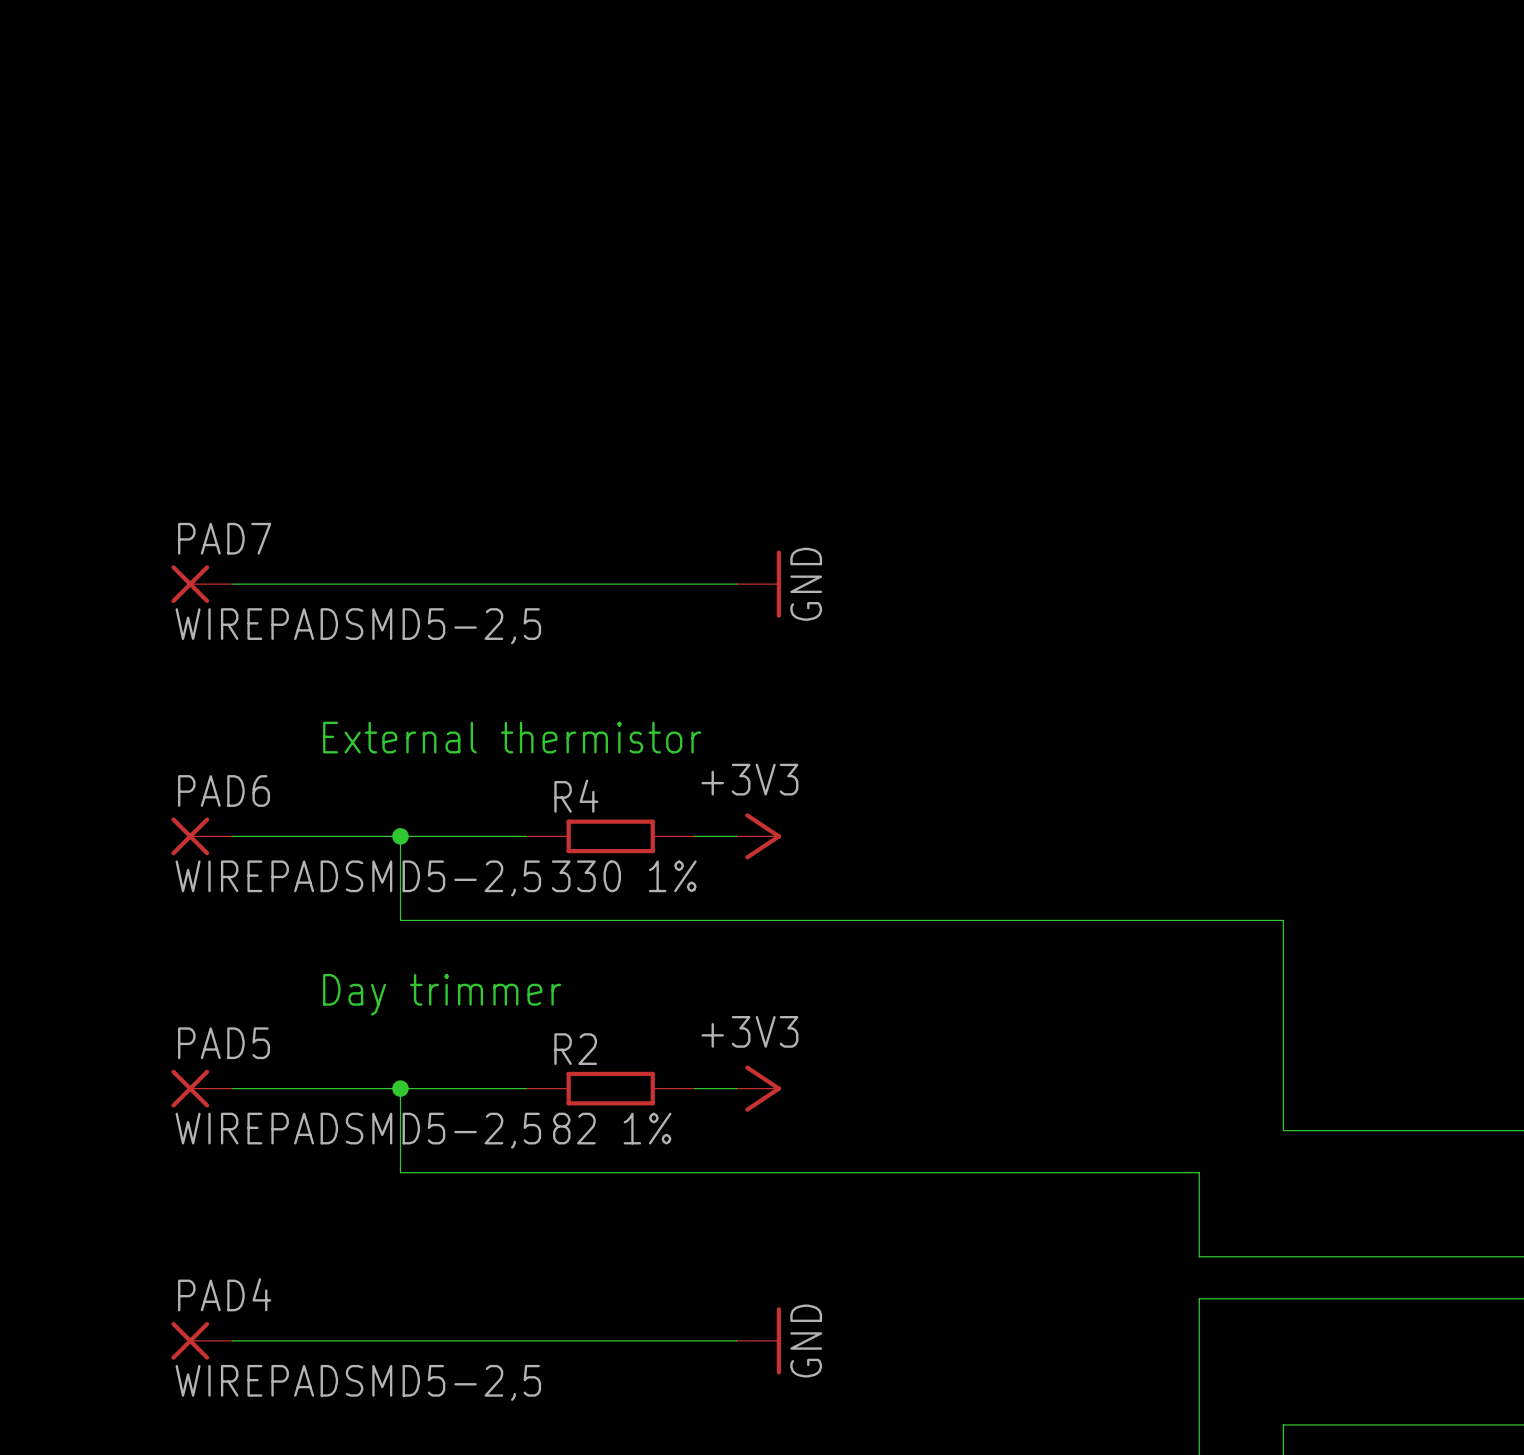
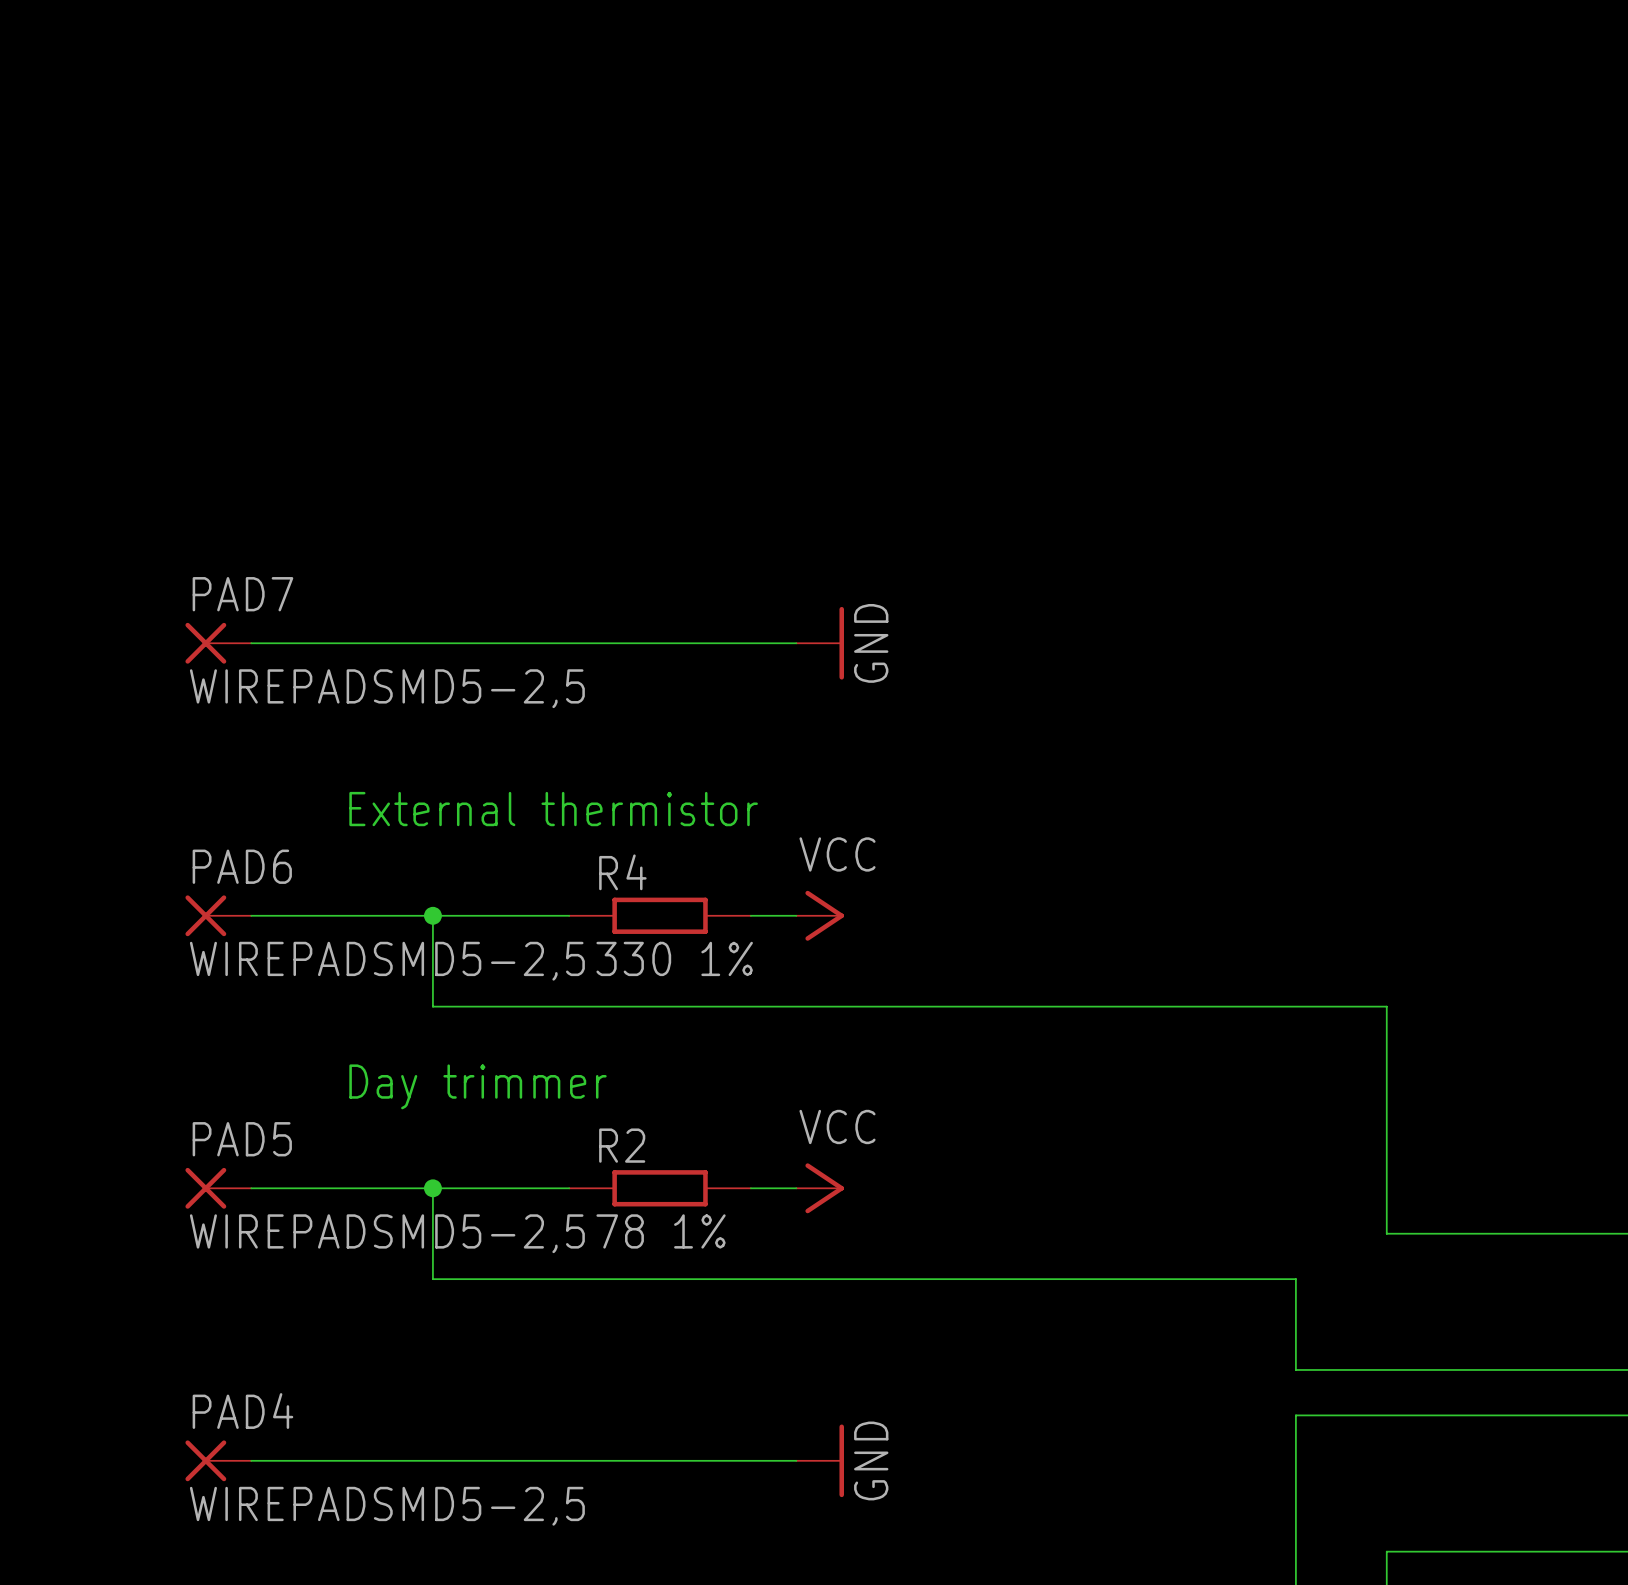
power symbol: +3V3 (758, 836) -> VCC (820, 915)
power symbol: +3V3 (758, 1088) -> VCC (820, 1188)
R2 value: 82 1% (612, 1128) -> 78 1% (661, 1231)

